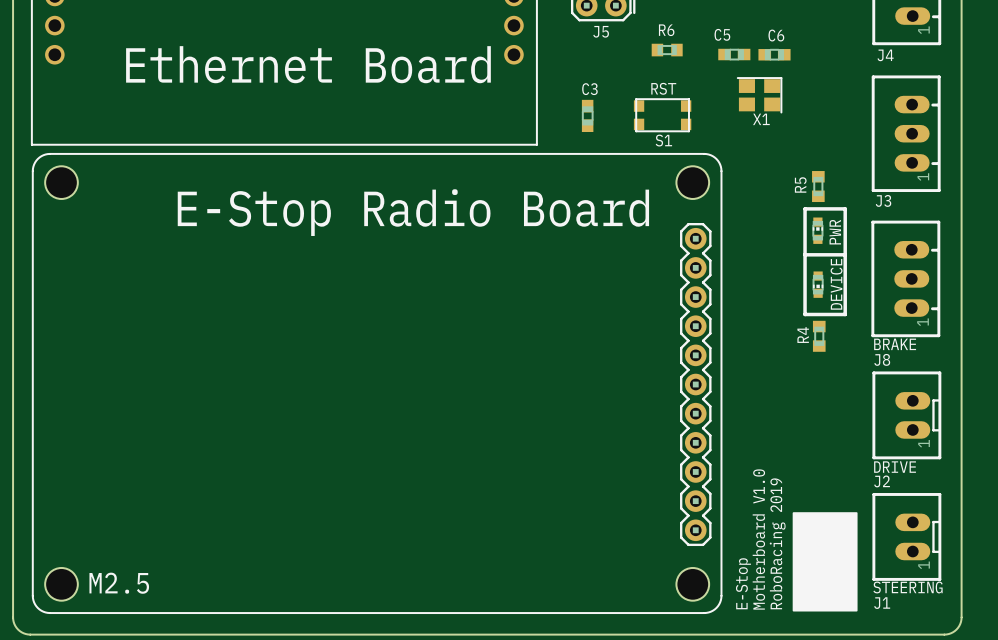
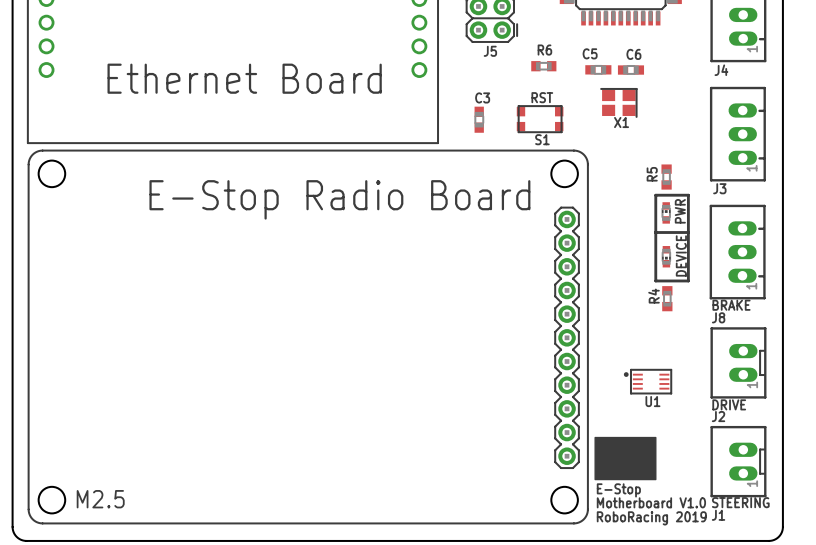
U1: none -> (647, 381)
drawing: none -> [594, 436, 657, 481]
drawing: [792, 512, 858, 612] -> none
text rotation: 0° (758, 539) -> 90° clockwise (651, 502)
text rotation: 0° (777, 543) -> 90° clockwise (651, 518)
text rotation: 0° (743, 583) -> 90° clockwise (618, 490)

